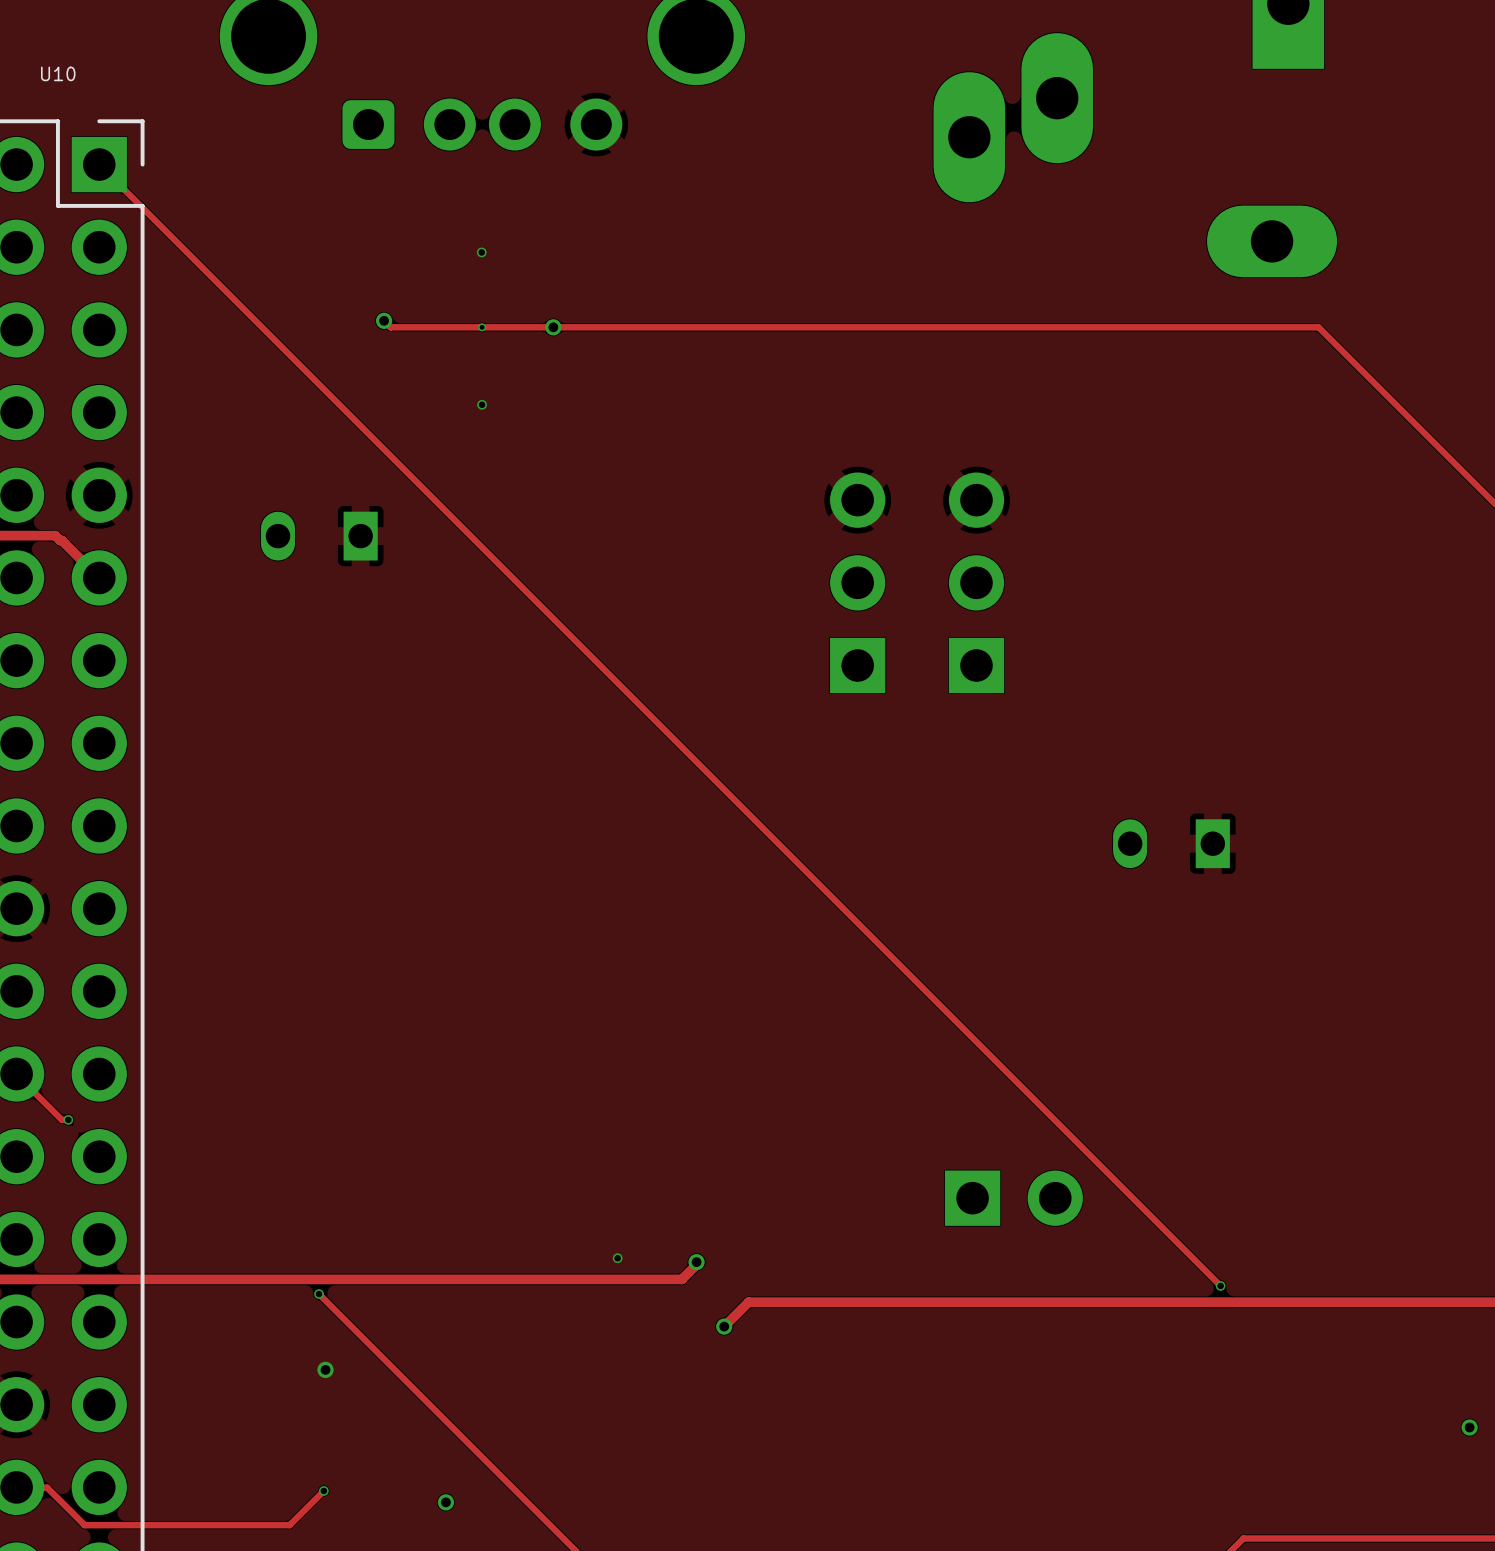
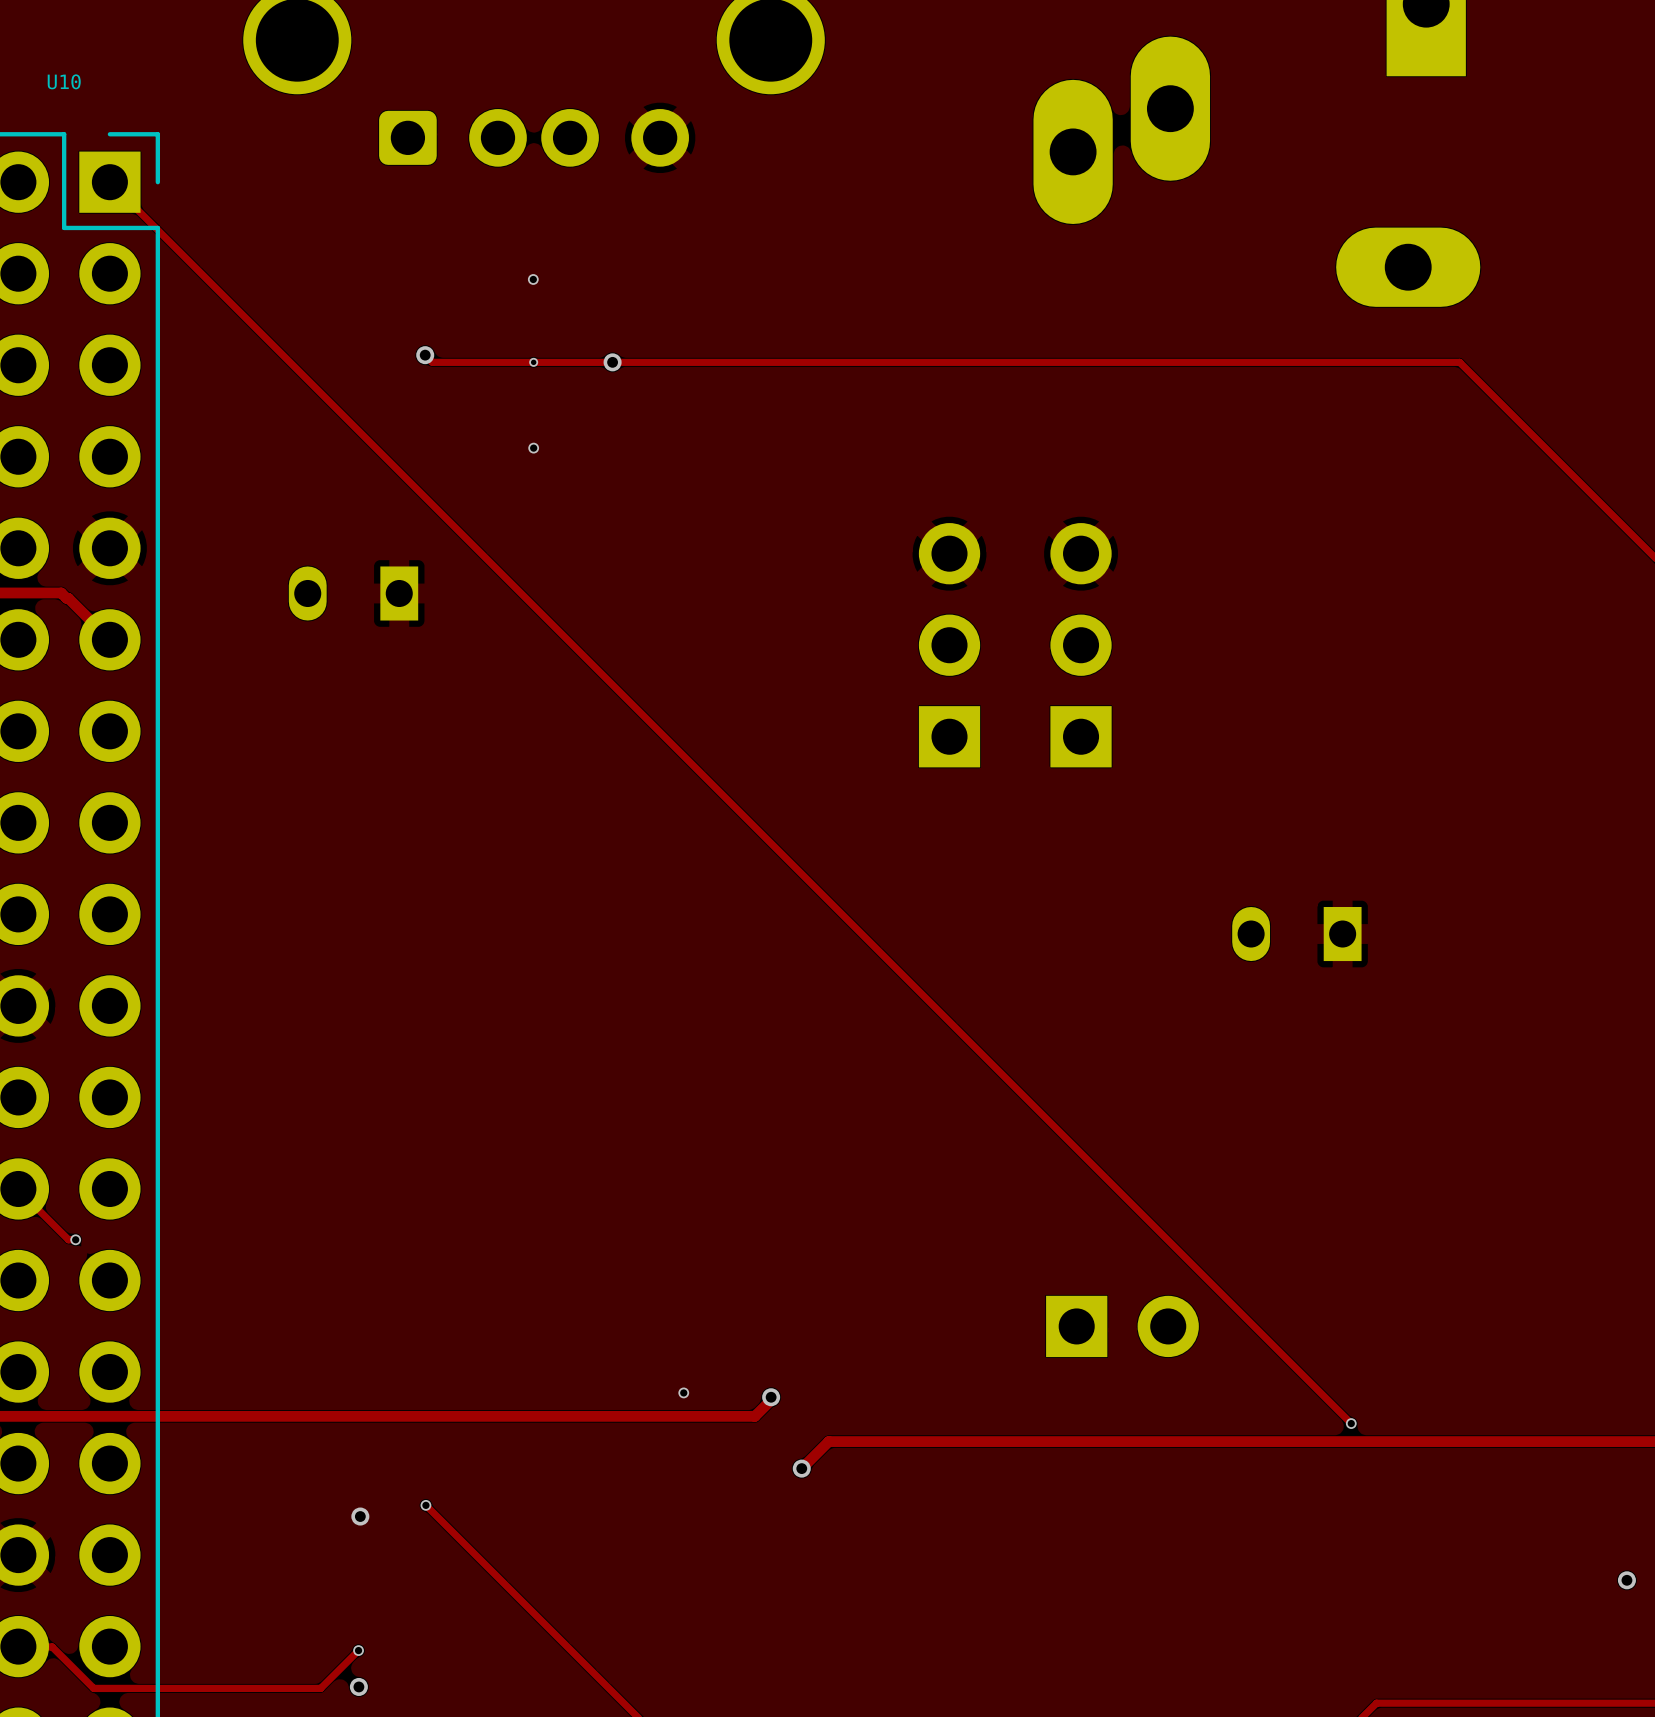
track: (318, 1294) (384, 1359) -> none
via position: (318, 1294) -> (425, 1505)
via position: (445, 1502) -> (358, 1686)

